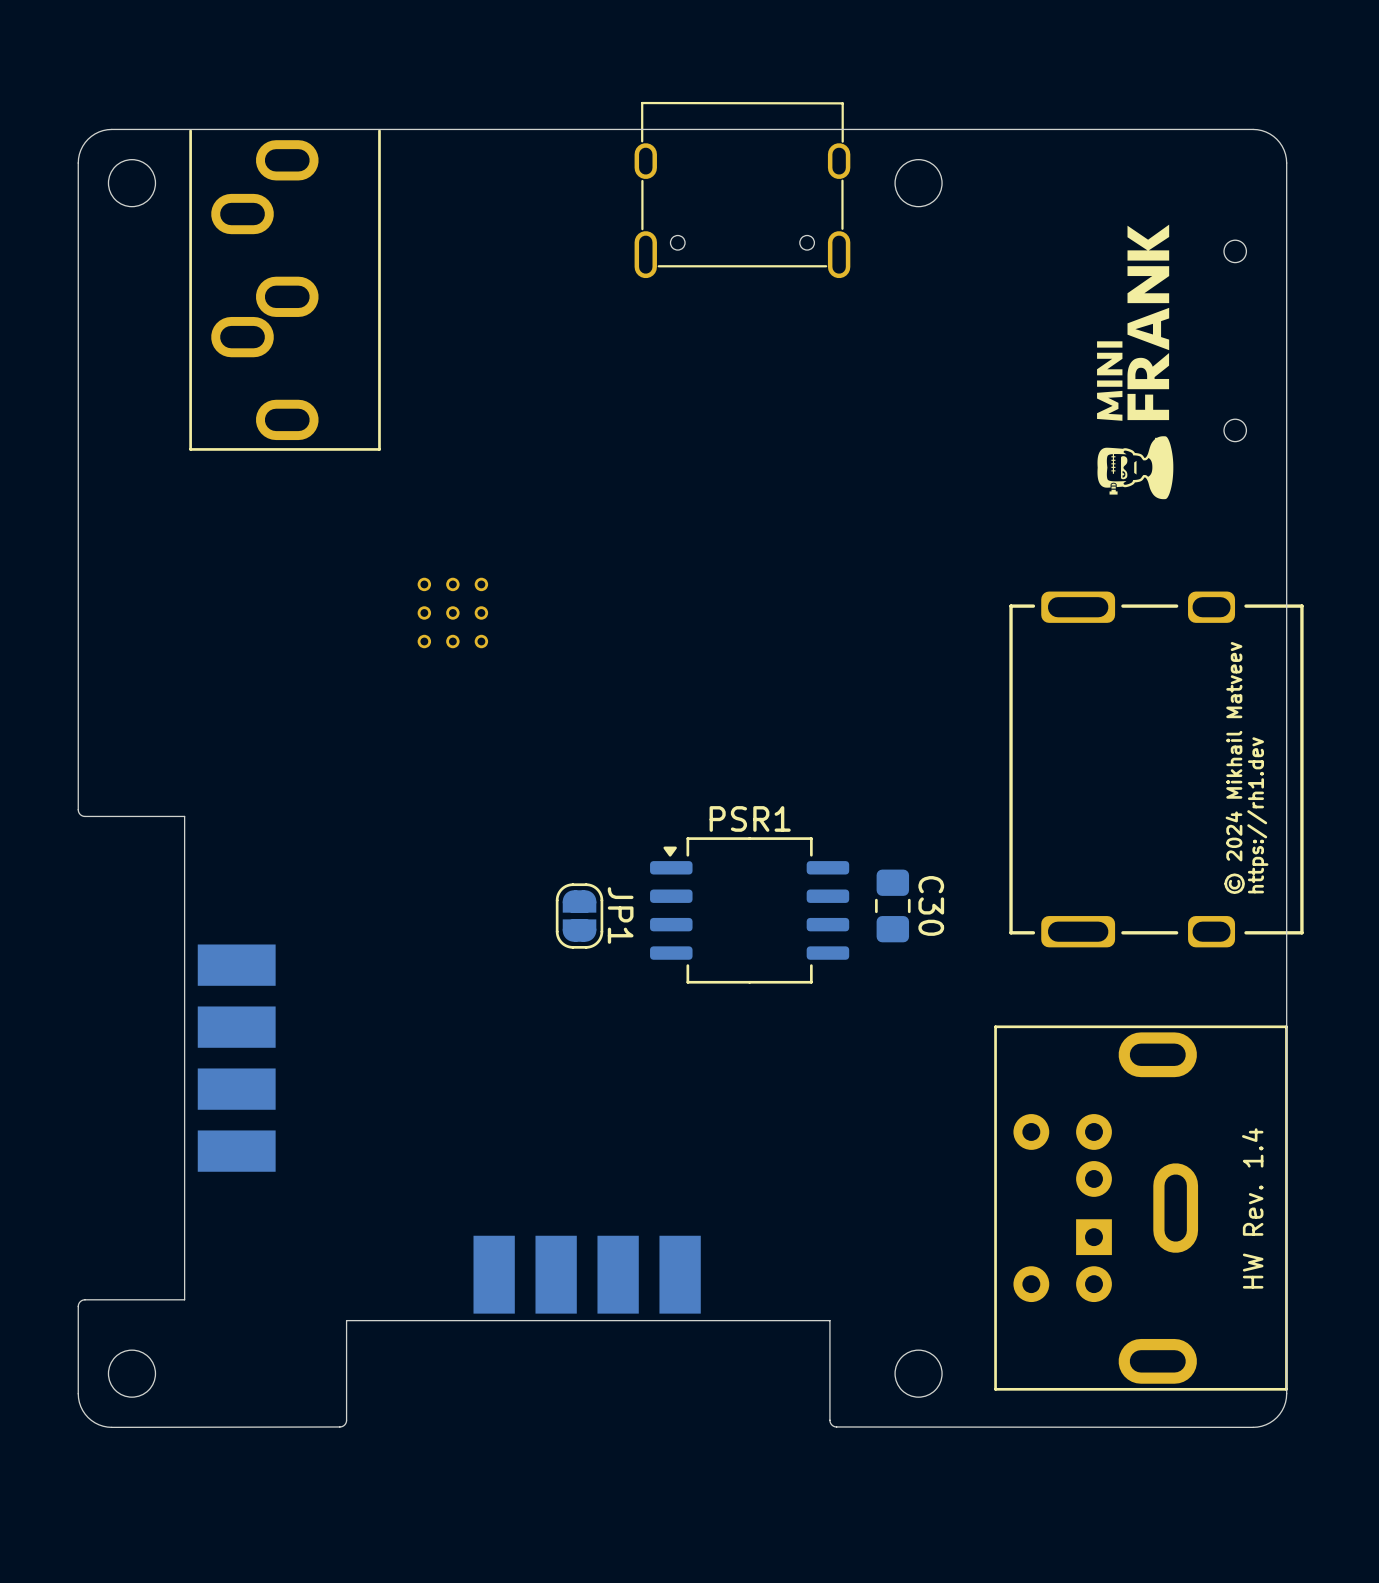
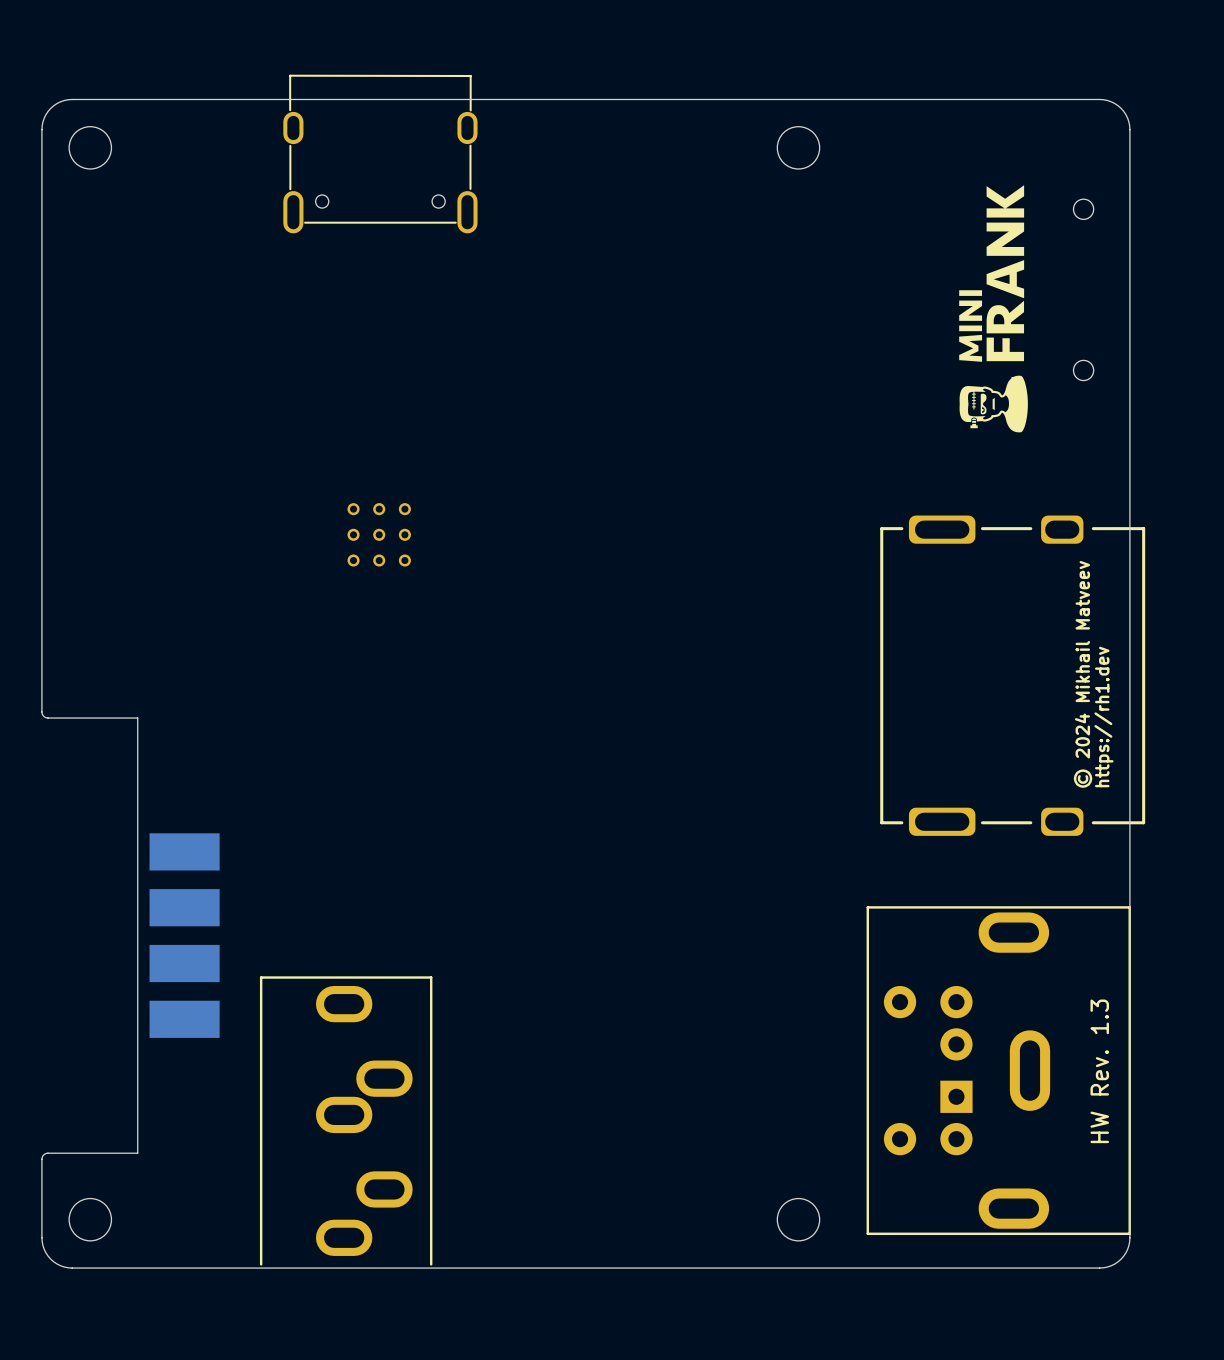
part position: (742, 190) -> (380, 154)
part: (285, 290) -> none
C30: (892, 905) -> none
PSR1: (749, 910) -> none
JP1: (579, 916) -> none
text: HW Rev. 1.4 (1252, 1208) -> HW Rev. 1.3 (1099, 1071)
part: none -> (346, 1120)
part: (587, 1274) -> none
board edge: (1253, 1427) (834, 1426) (829, 1420) (829, 1320) (346, 1320) (346, 1420) (342, 1426) (111, 1427) -> (1099, 1268) (72, 1268)

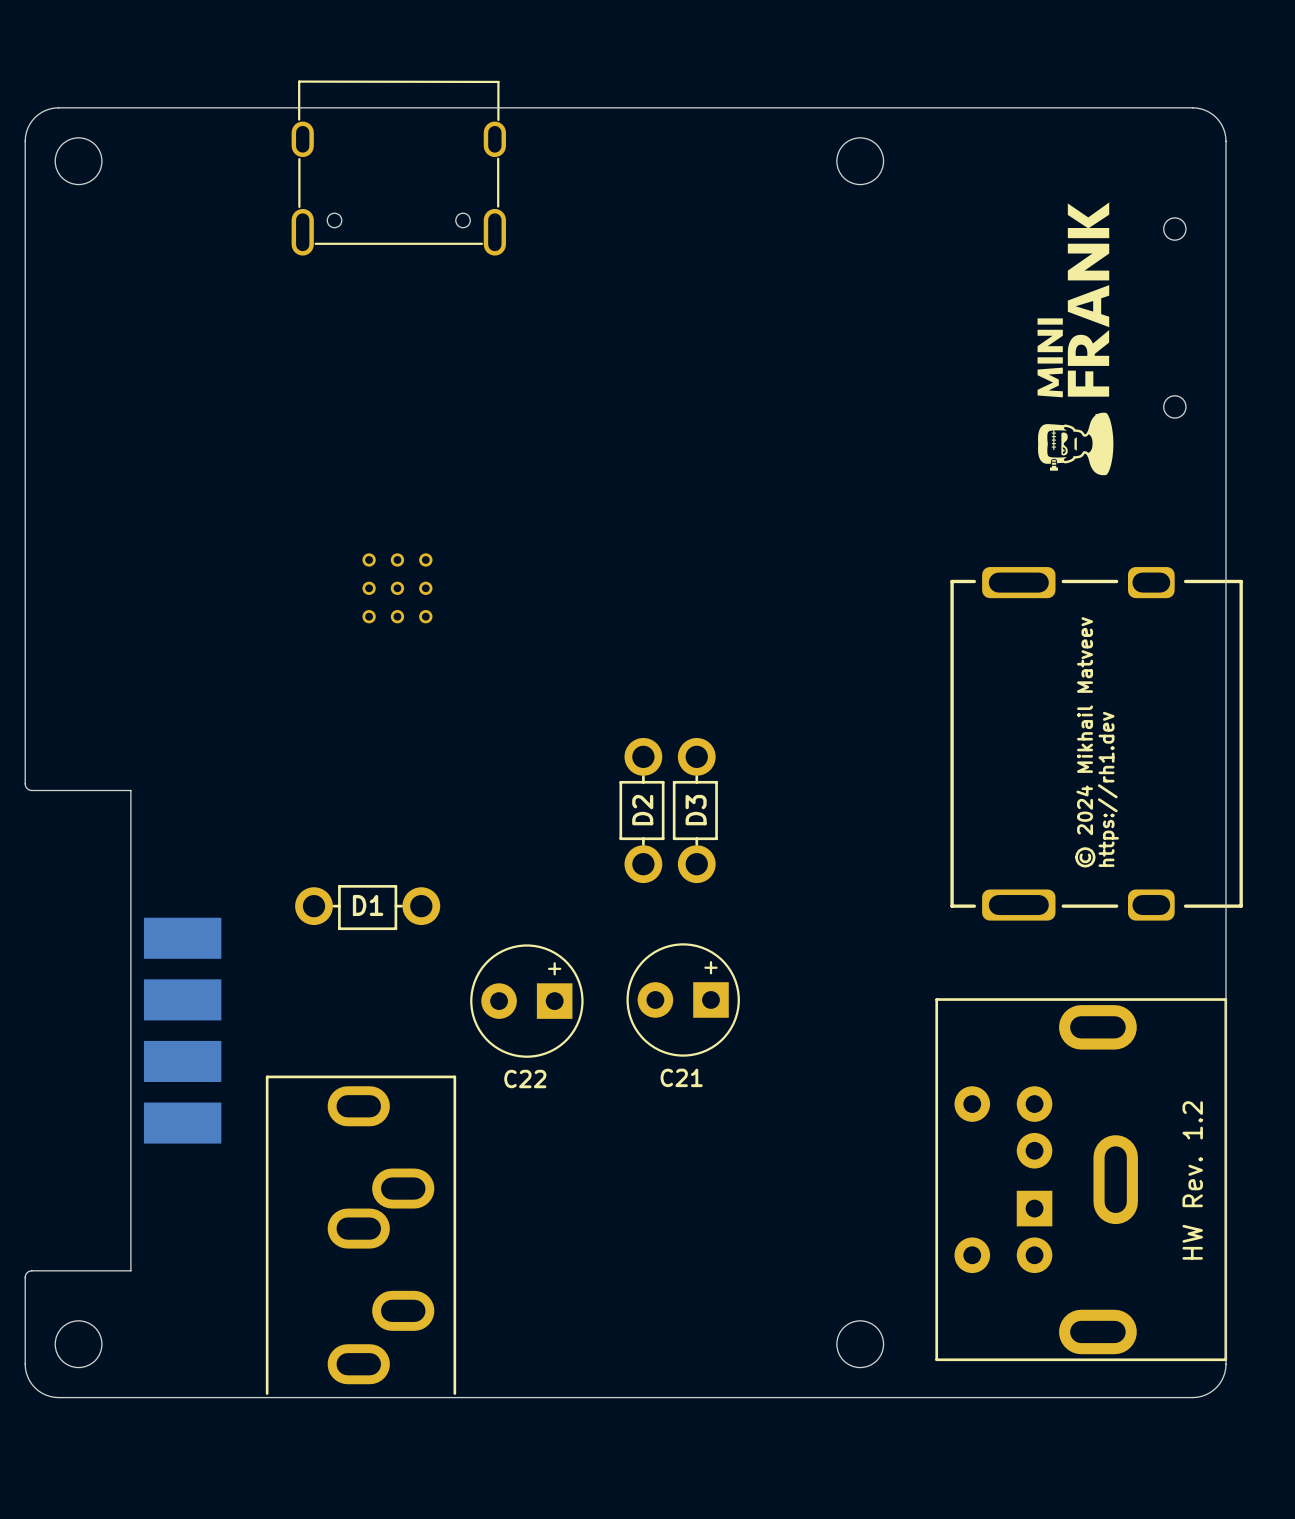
text position: © 2024 Mikhail Matveev (1083, 674) -> © 2024 Mikhail Matveev (1085, 742)
text position: https://rh1.dev (1103, 717) -> https://rh1.dev (1108, 789)
D2: none -> (641, 810)
D3: none -> (695, 810)
D1: none -> (367, 907)
C21: none -> (683, 999)
C22: none -> (526, 1001)
text: HW Rev. 1.3 (1099, 1071) -> HW Rev. 1.2 (1192, 1180)

